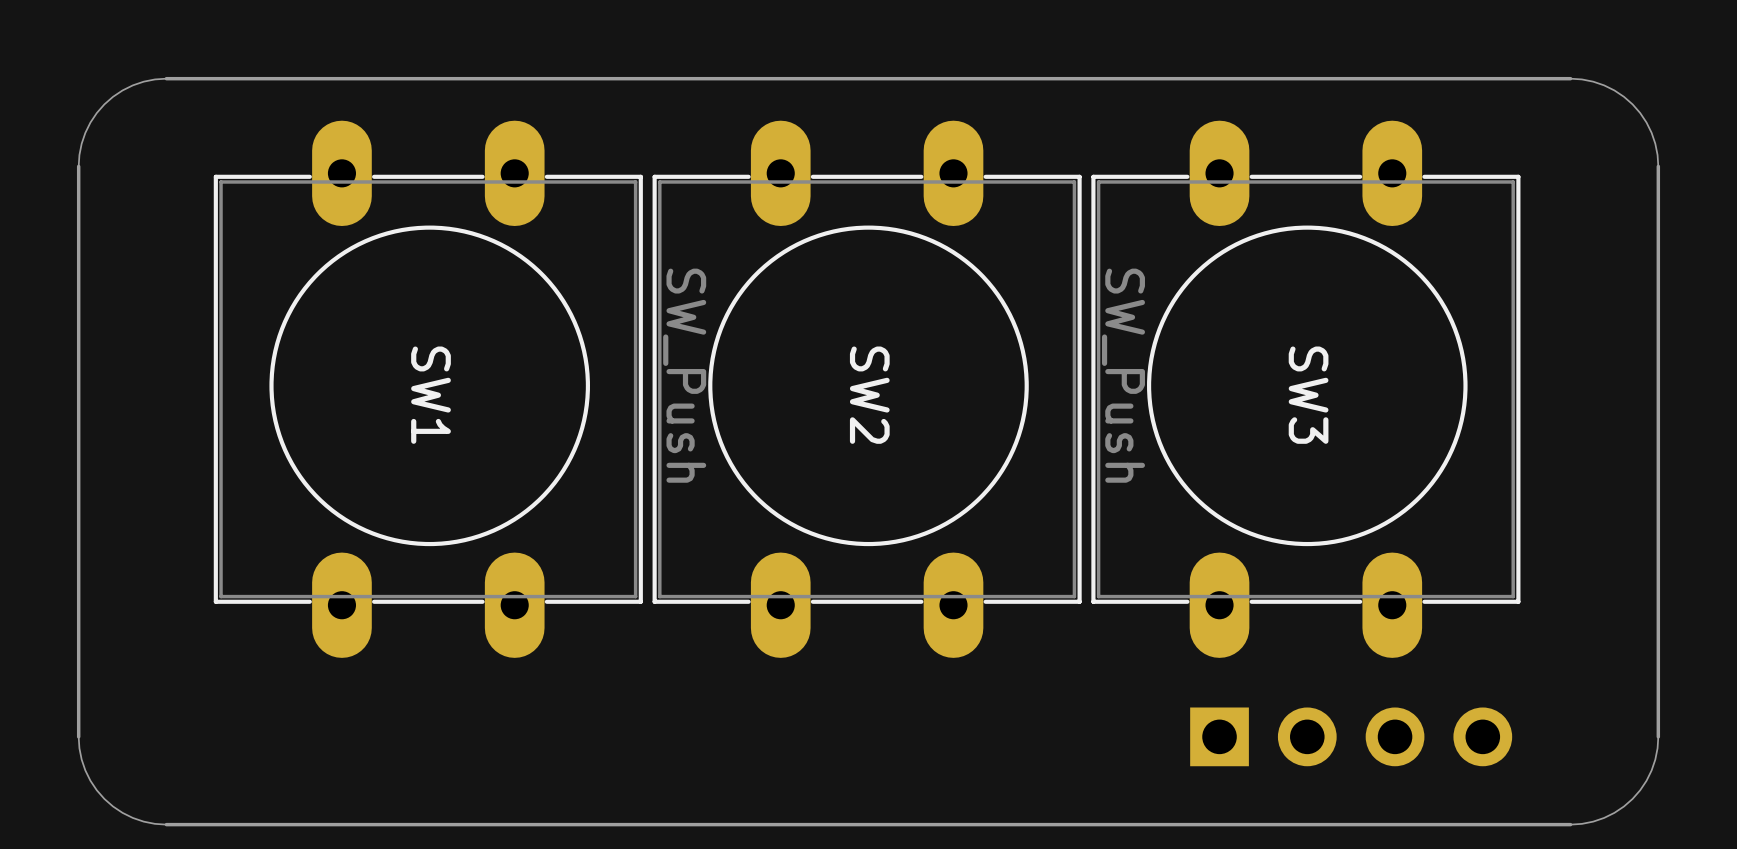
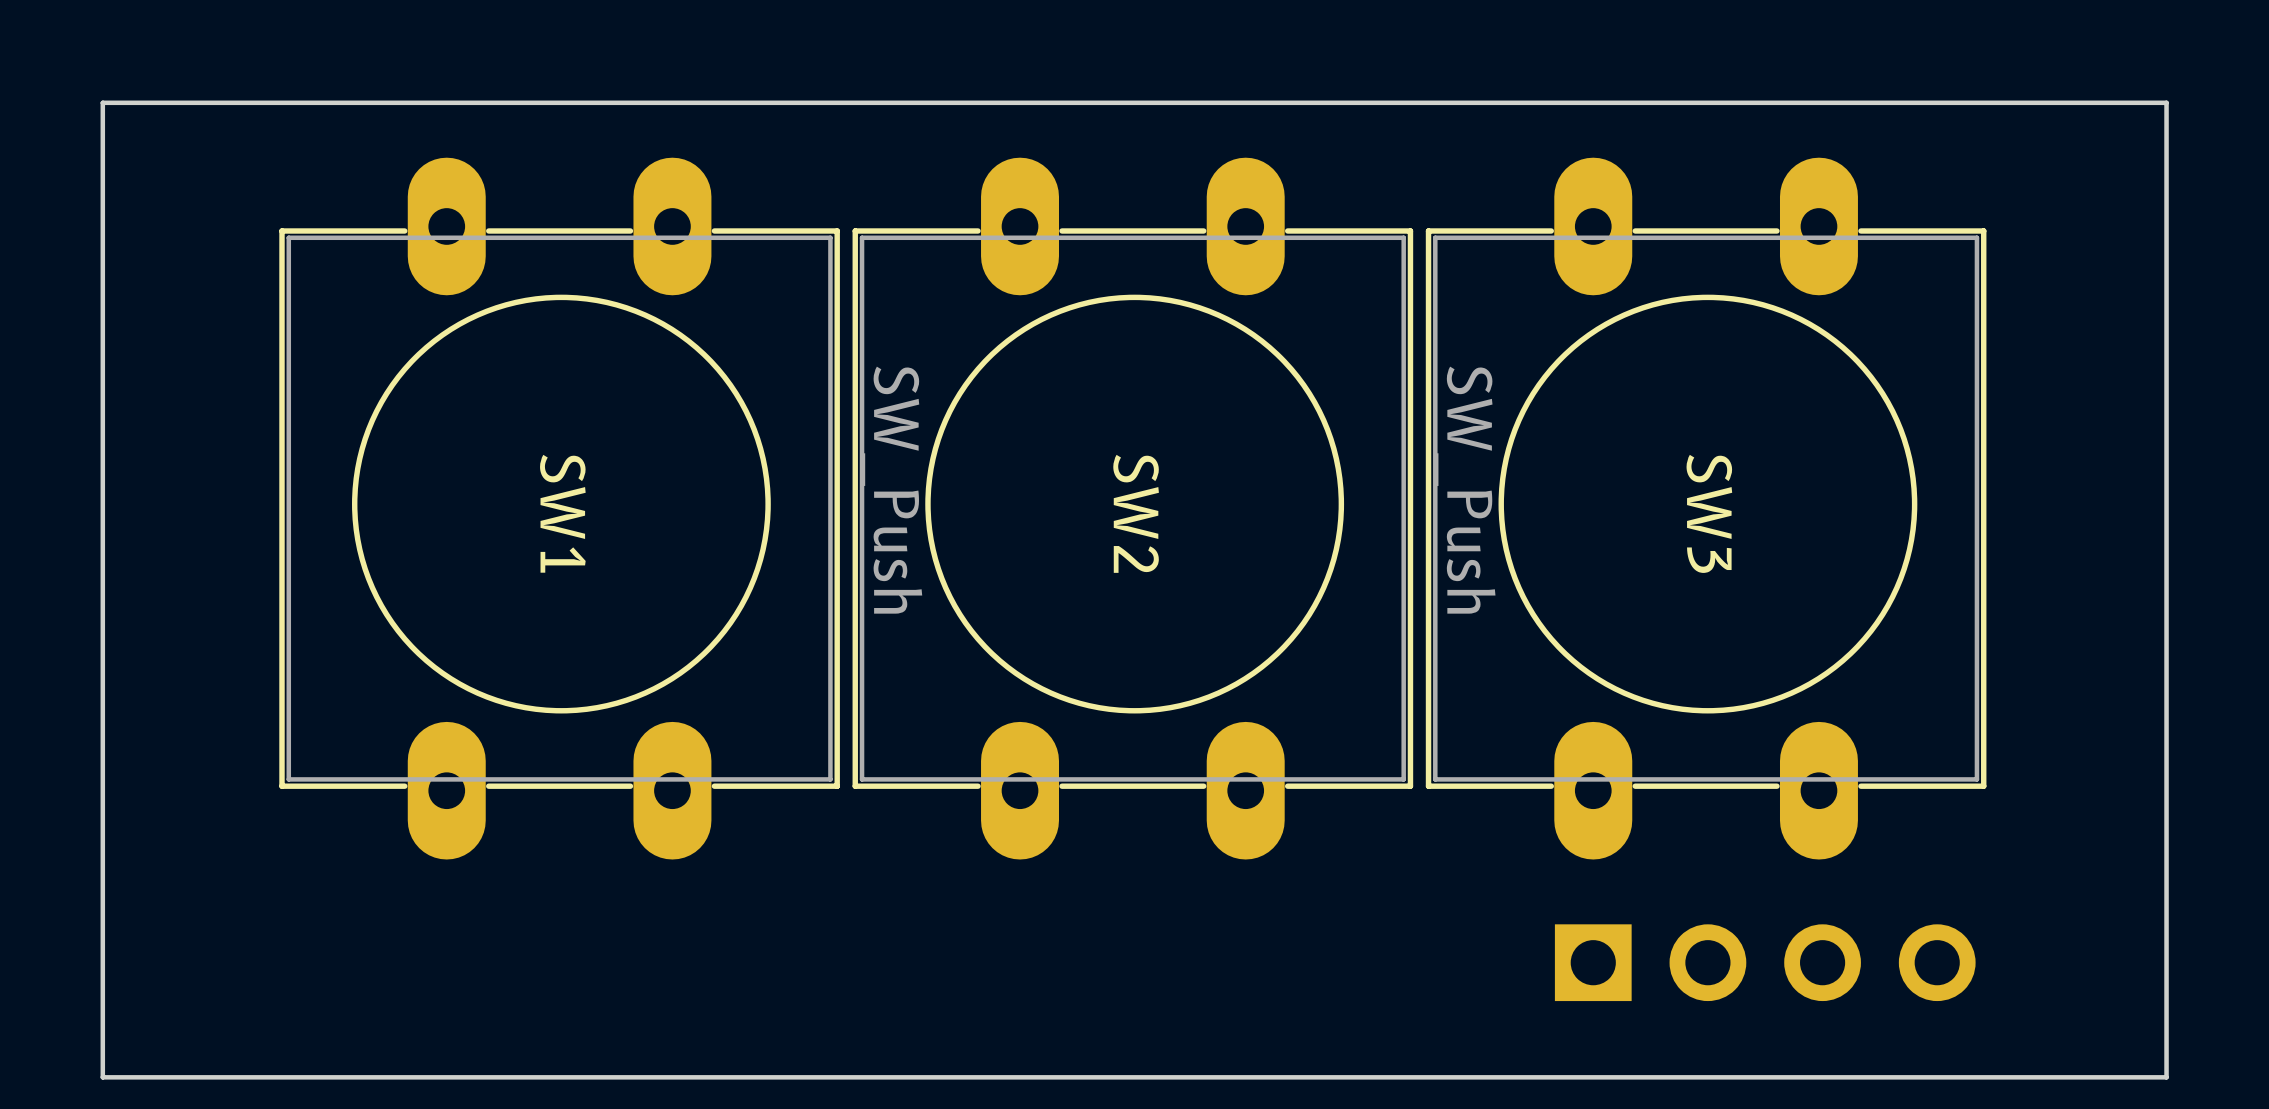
board edge: (166, 78) (132, 85) (104, 104) (85, 132) (78, 166) -> (217, 102) (102, 102) (102, 217)
board edge: (1570, 78) (1604, 85) (1632, 104) (1651, 132) (1658, 166) -> (2051, 102) (2166, 102) (2166, 217)
board edge: (78, 736) (85, 770) (104, 798) (132, 817) (166, 824) -> (102, 962) (102, 1077) (217, 1077)
board edge: (1658, 736) (1651, 770) (1632, 798) (1604, 817) (1570, 824) -> (2166, 962) (2166, 1077) (2051, 1077)

